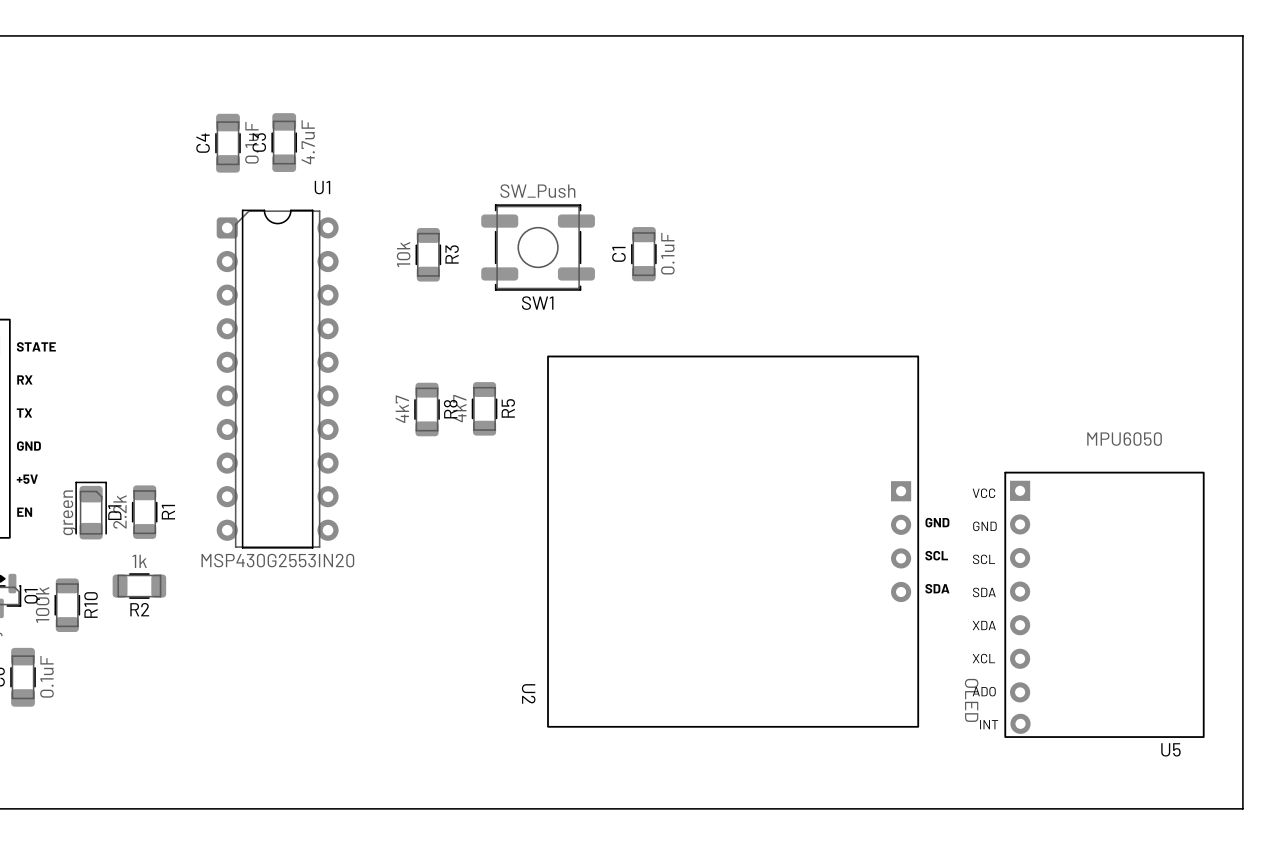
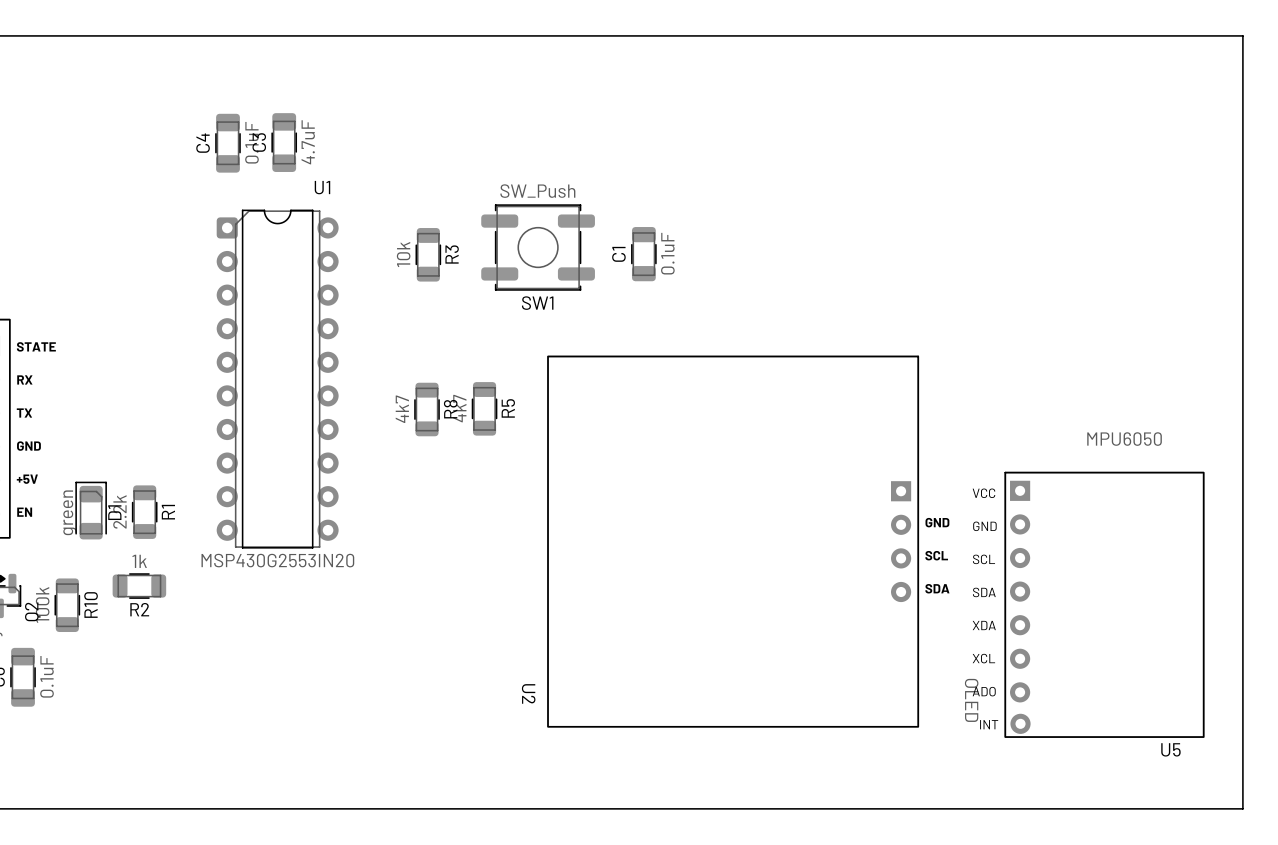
Q1 name: Q1 (32, 596) -> Q2 (32, 611)

